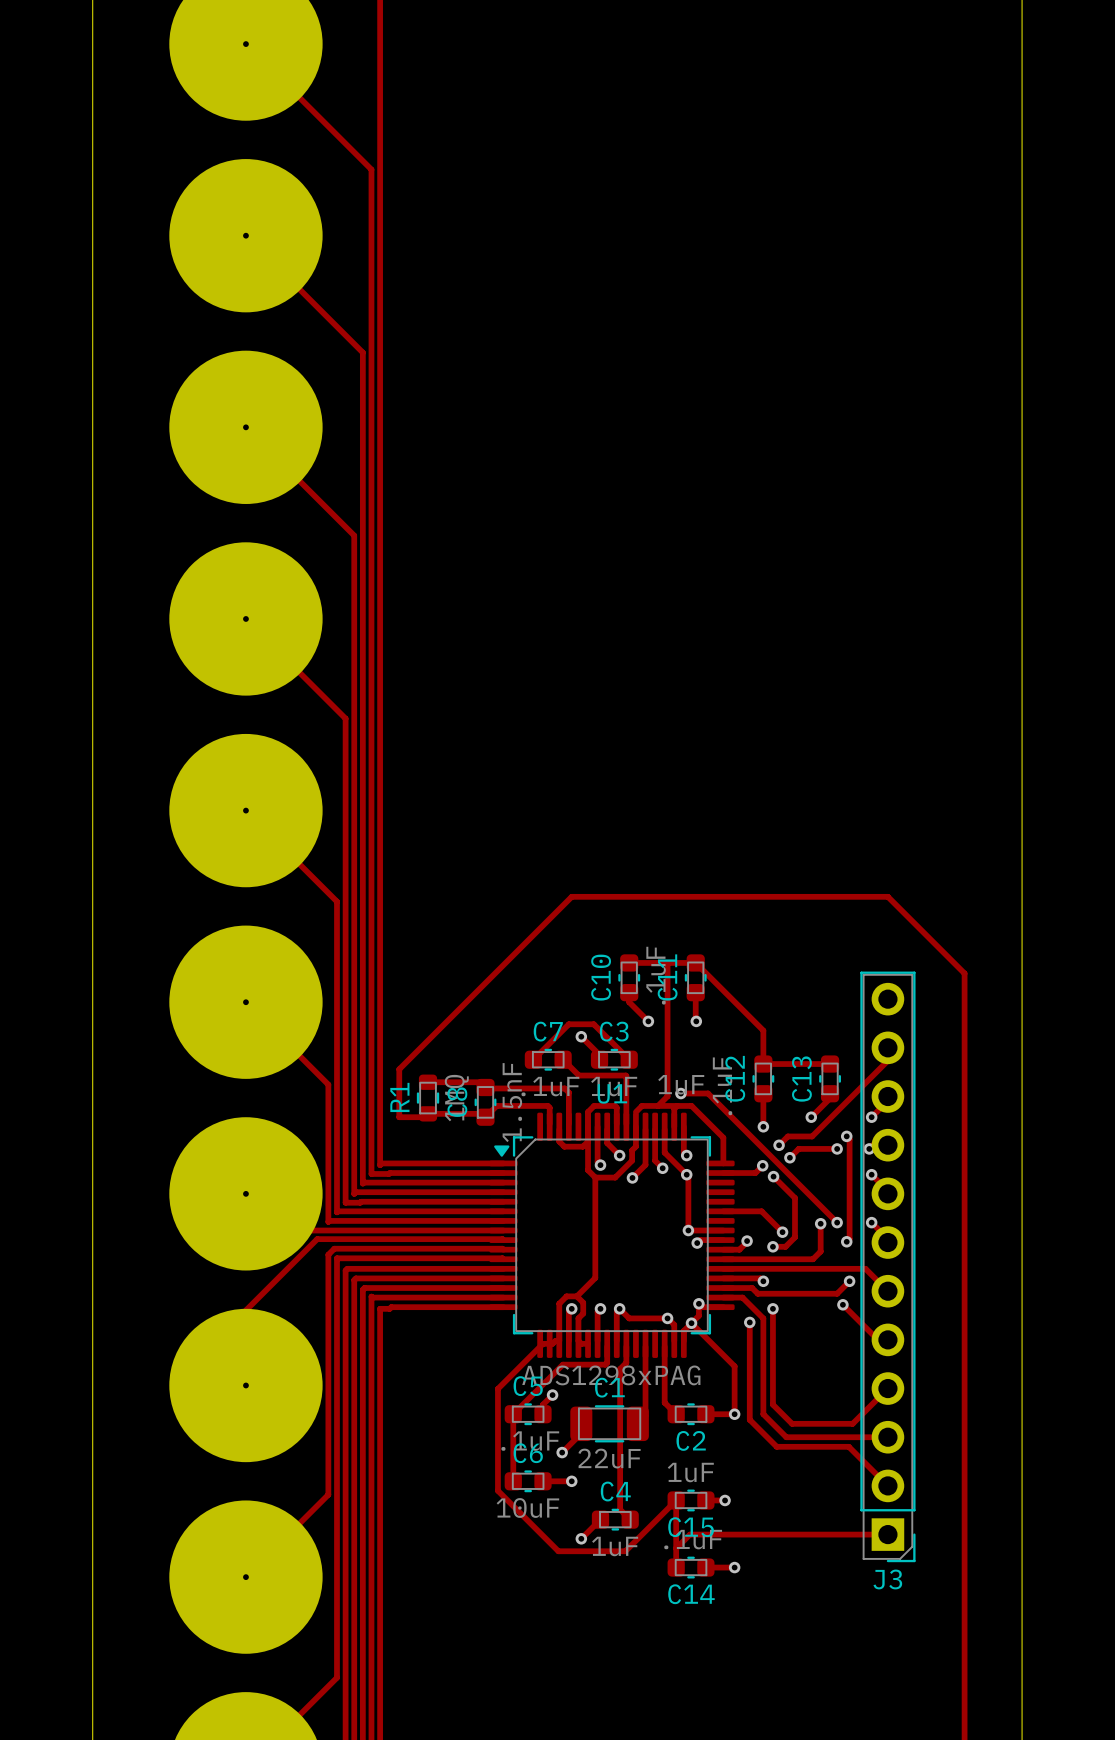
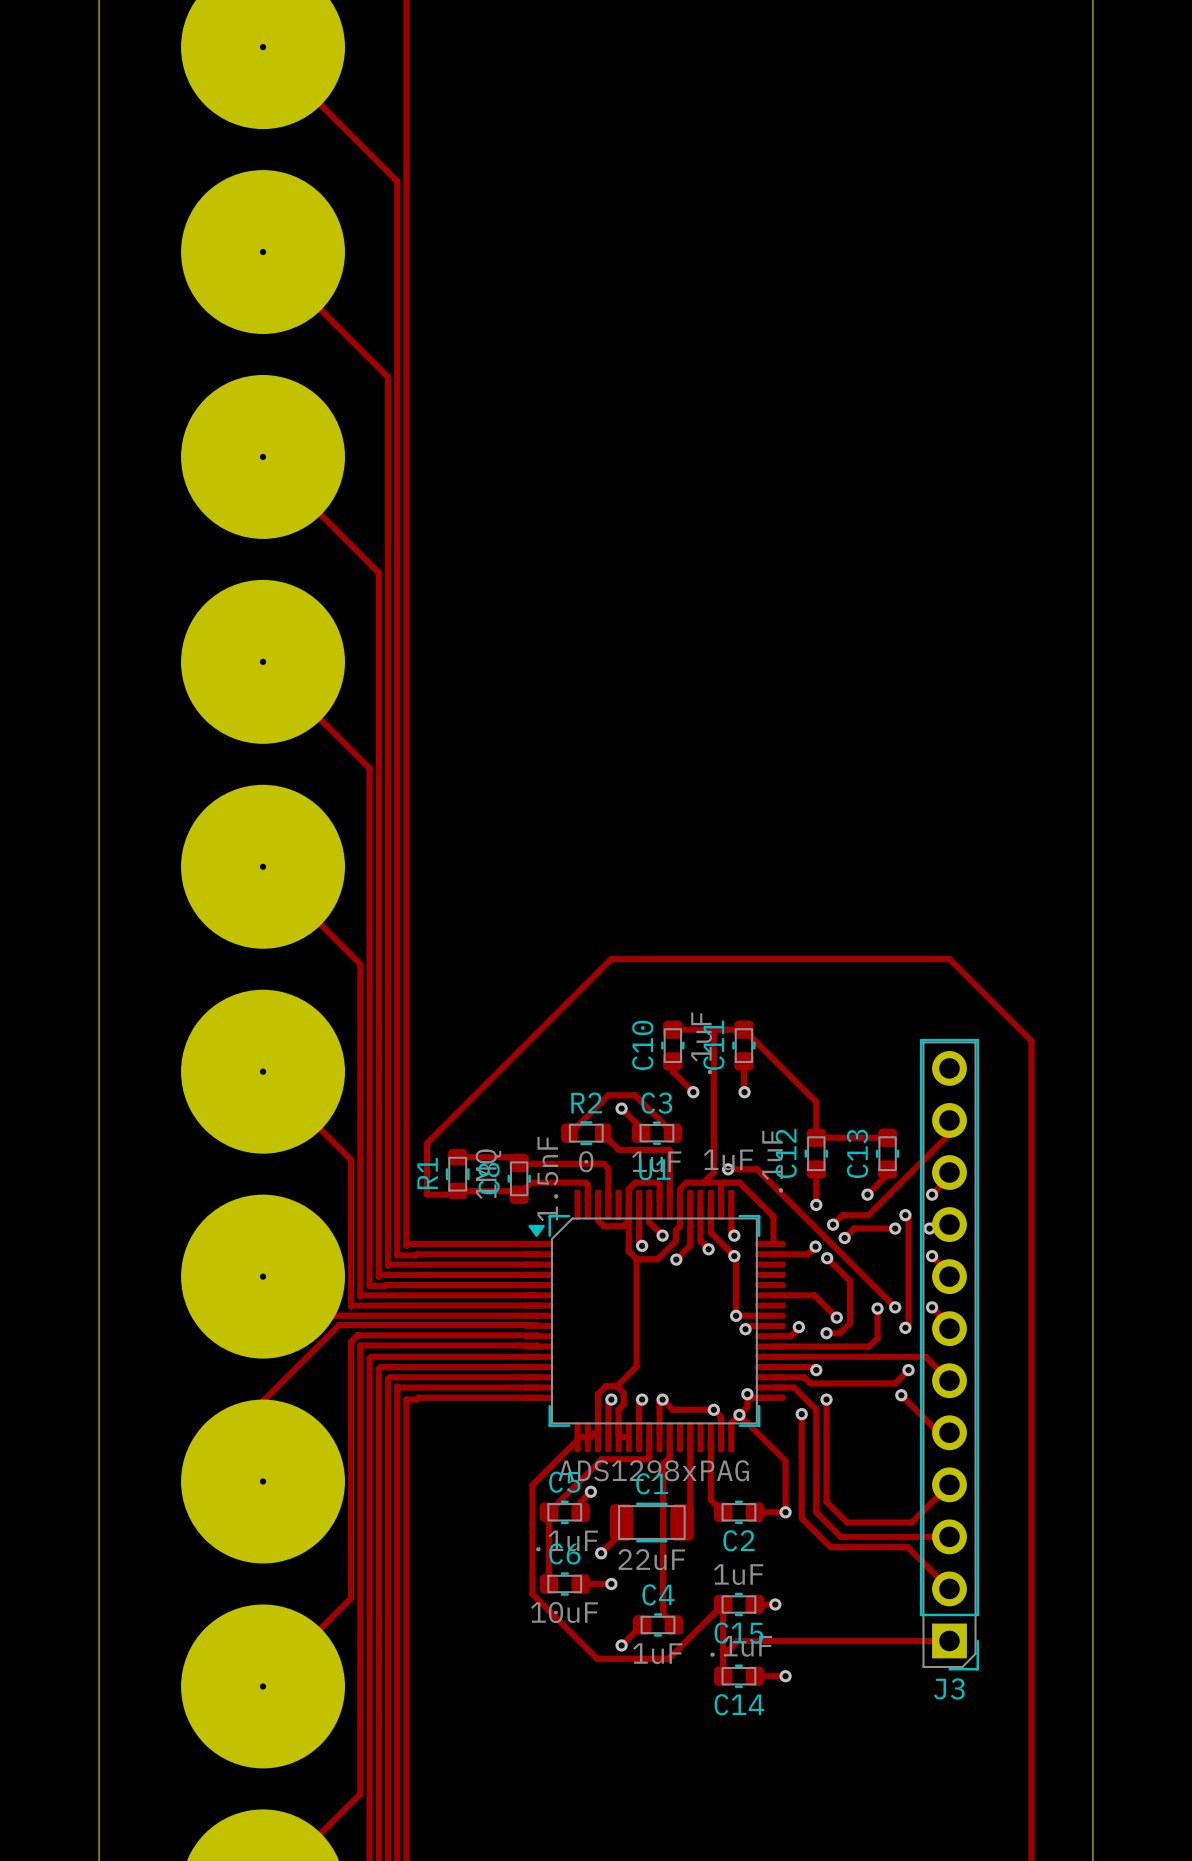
C7: .1uF (548, 1059) -> none
R2: none -> 0 (586, 1133)

